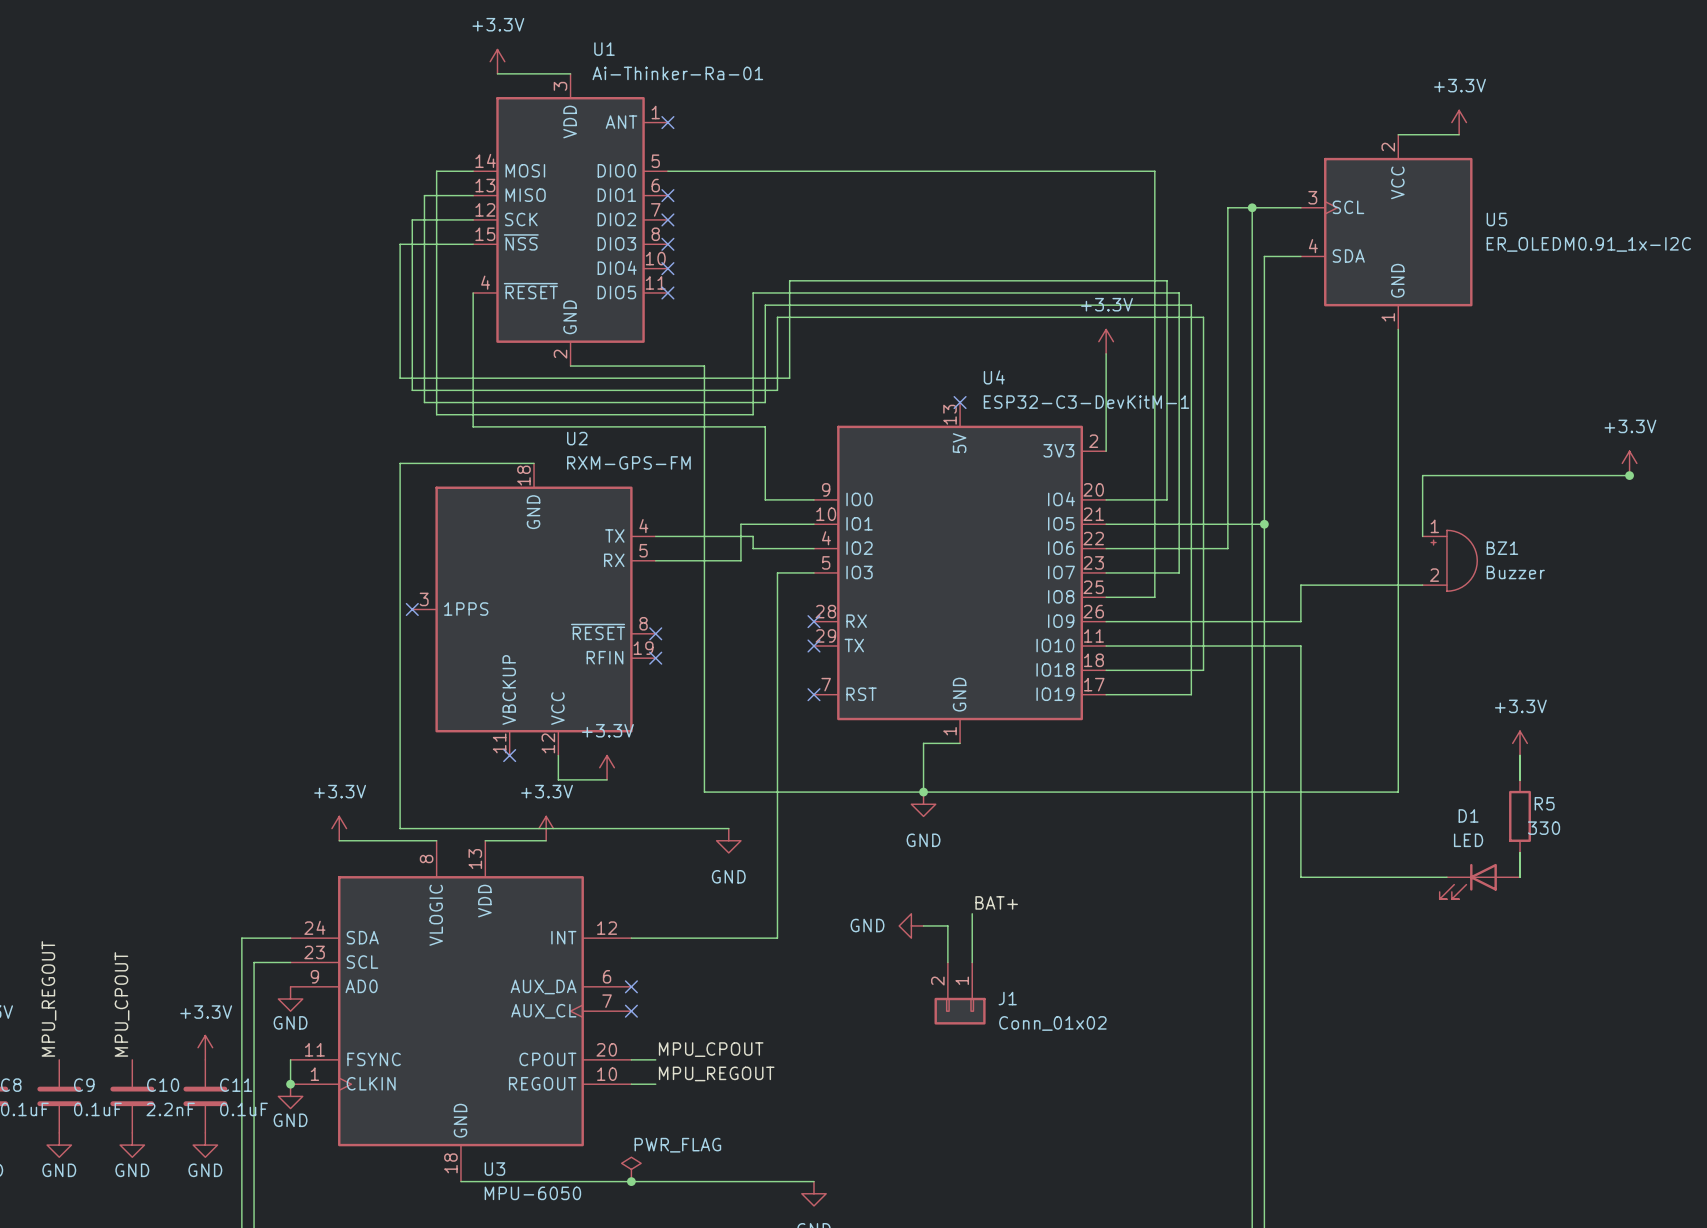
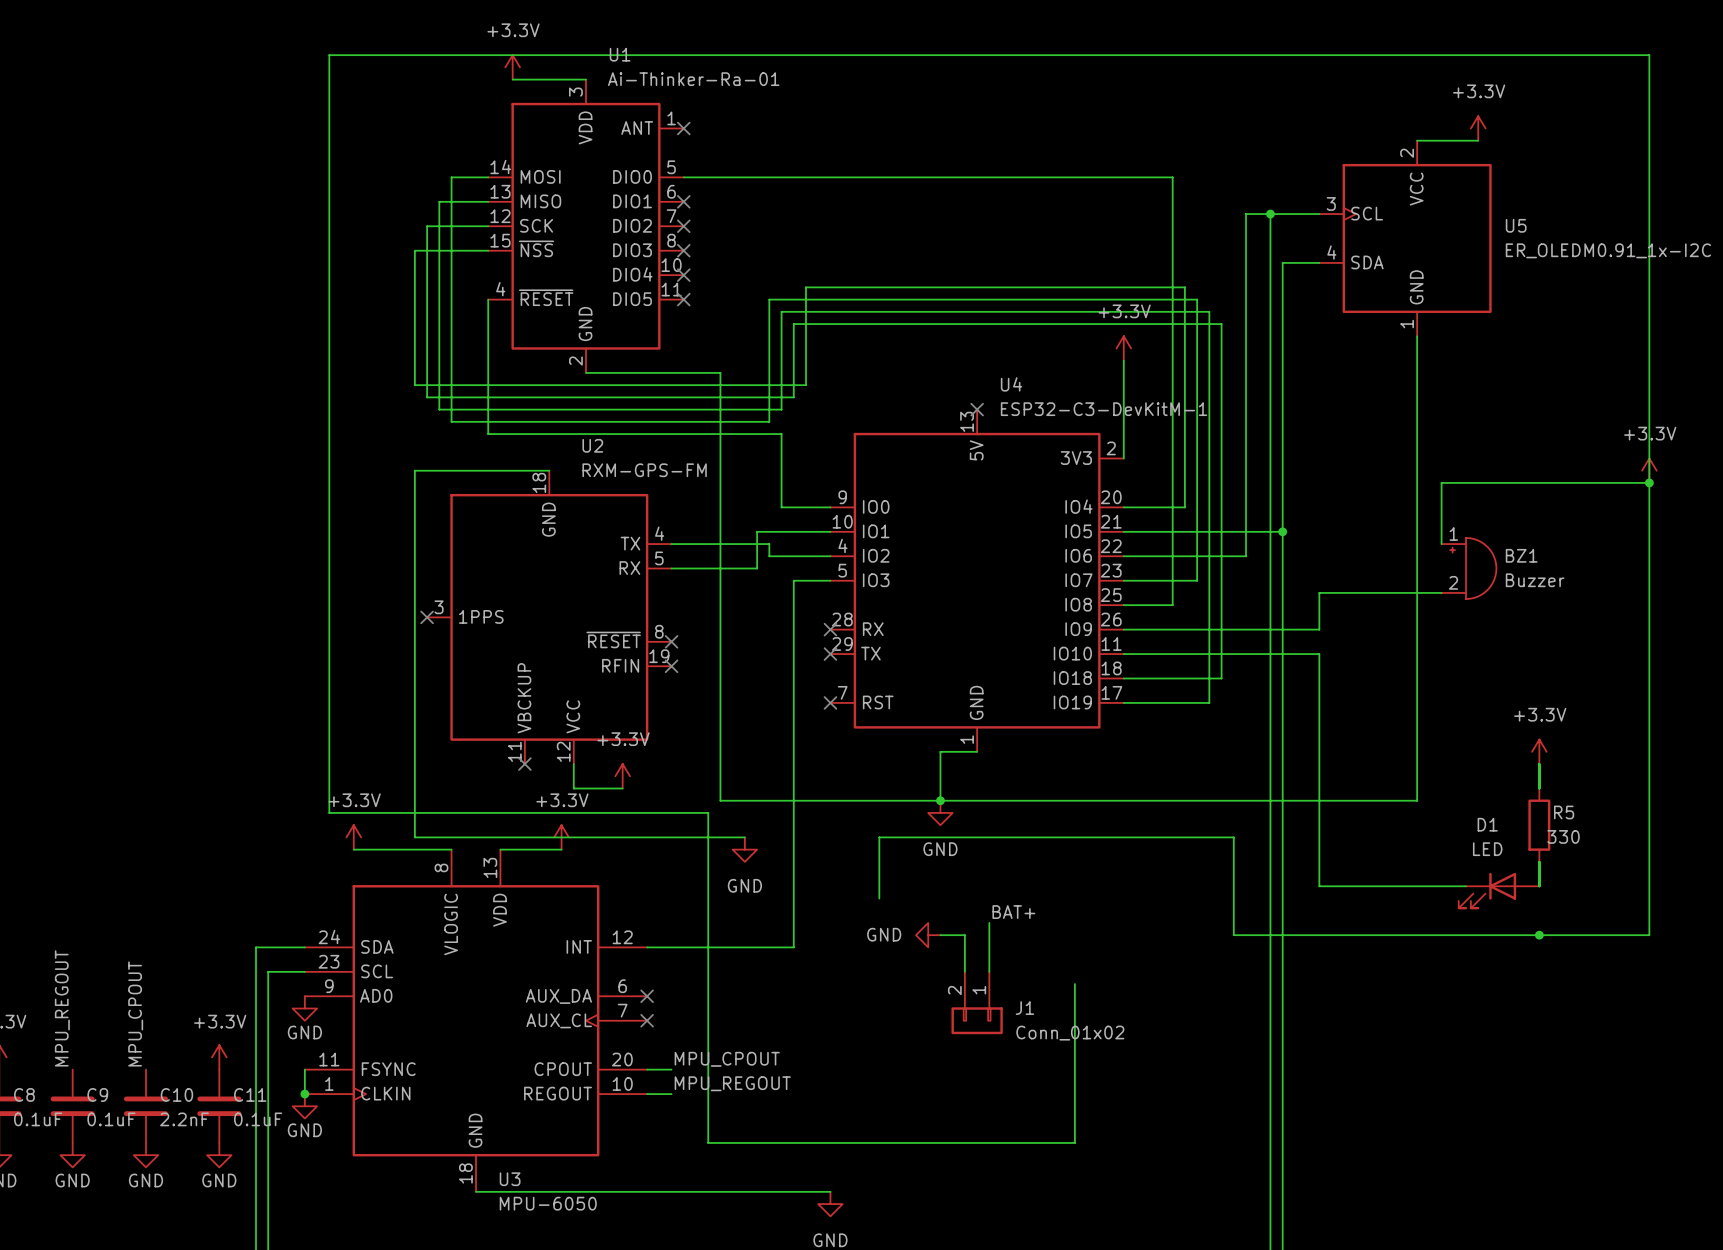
wire: none -> (879, 898) (879, 837) (1233, 837) (1233, 935) (1649, 935) (1649, 55) (329, 55) (329, 812) (708, 812) (708, 1142) (1074, 1142) (1074, 984)
junction: none -> (1539, 935)
power symbol: PWR_FLAG (631, 1169) -> none
junction: (631, 1181) -> none

